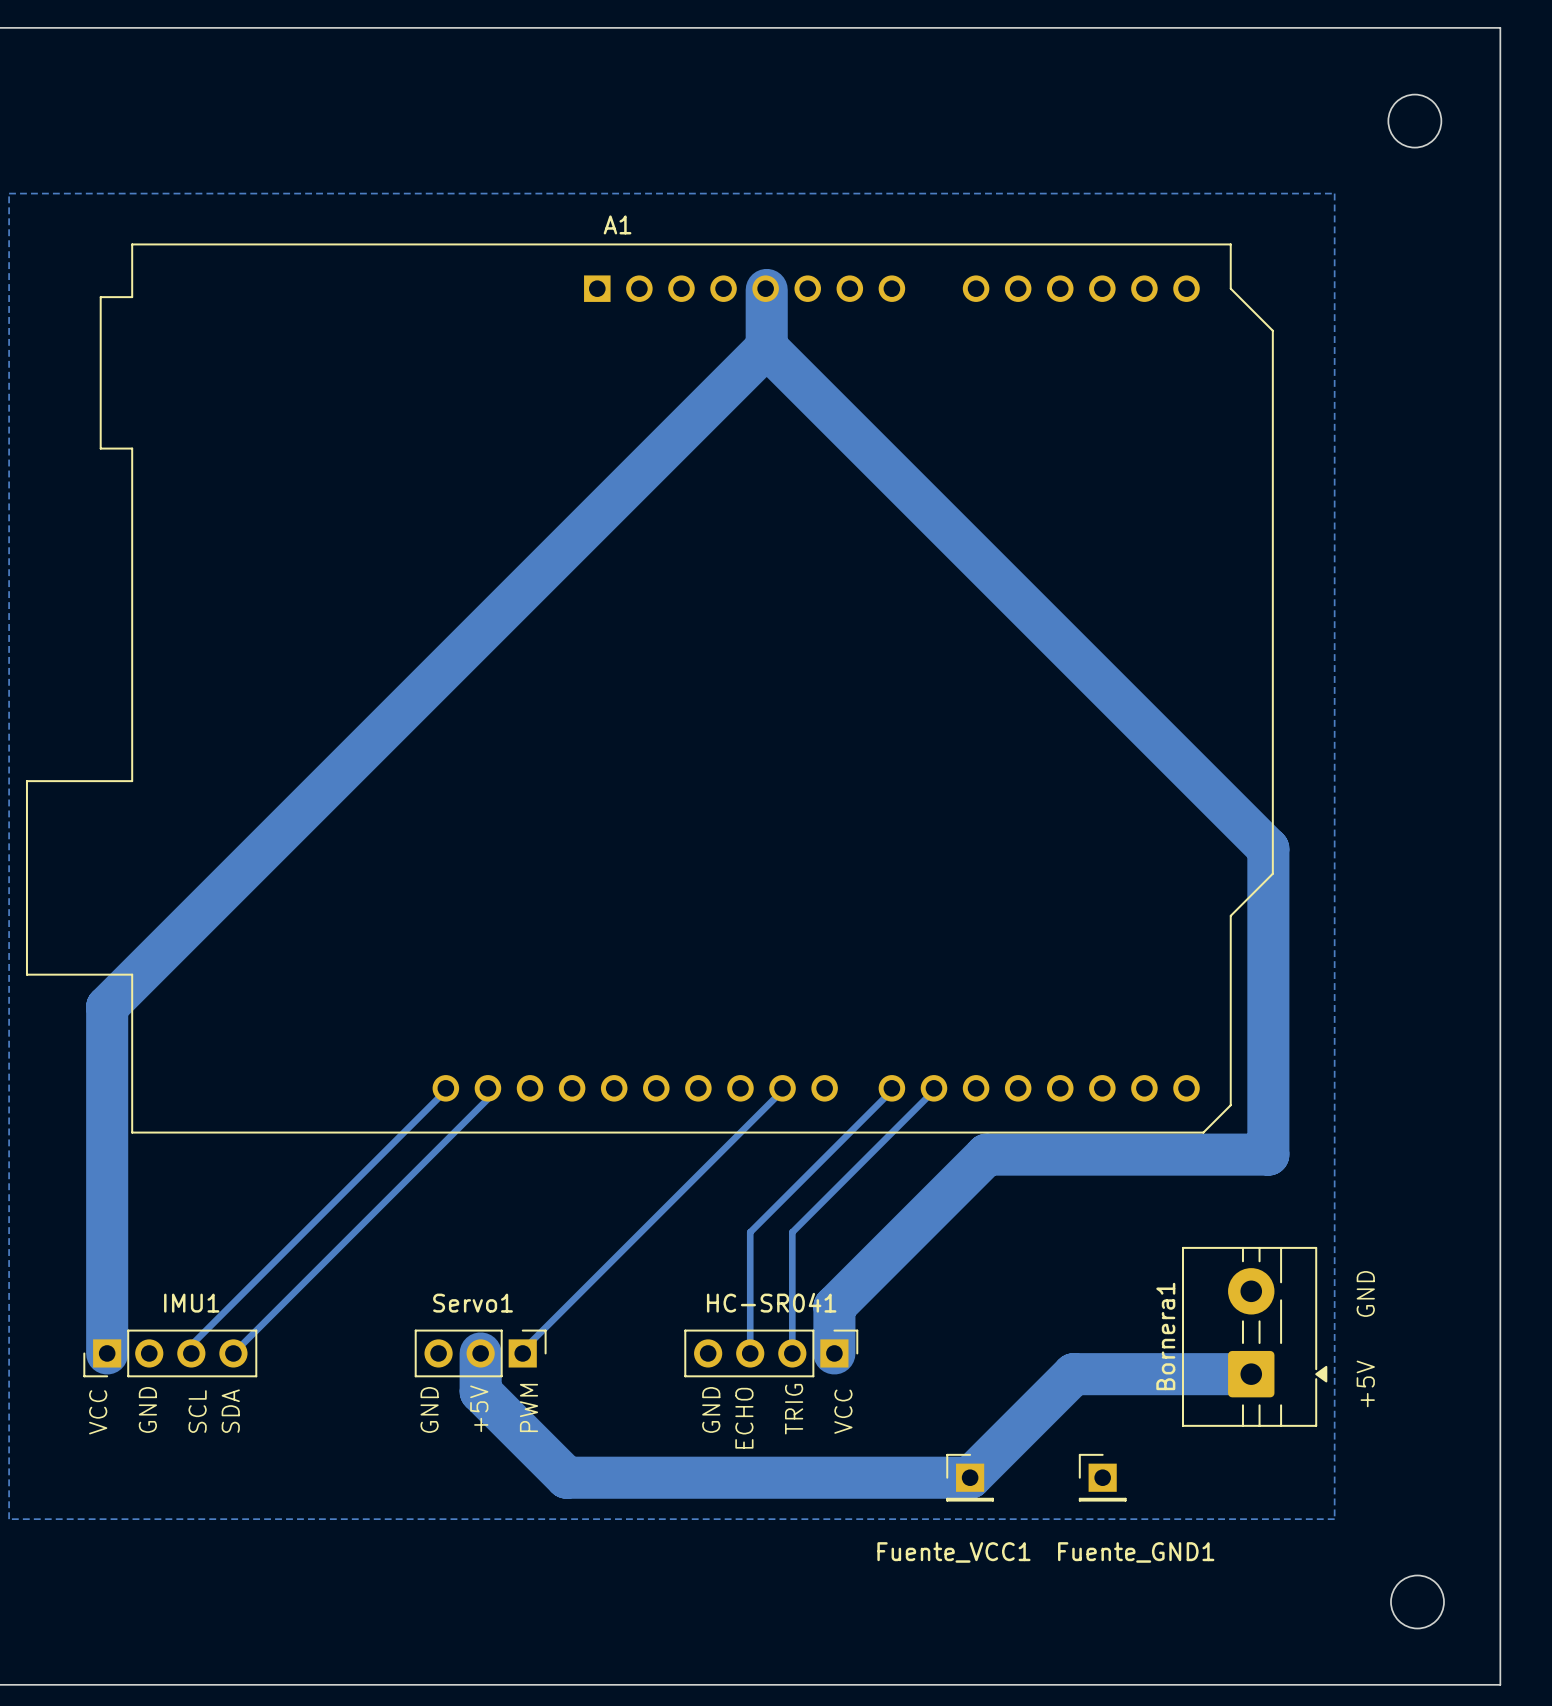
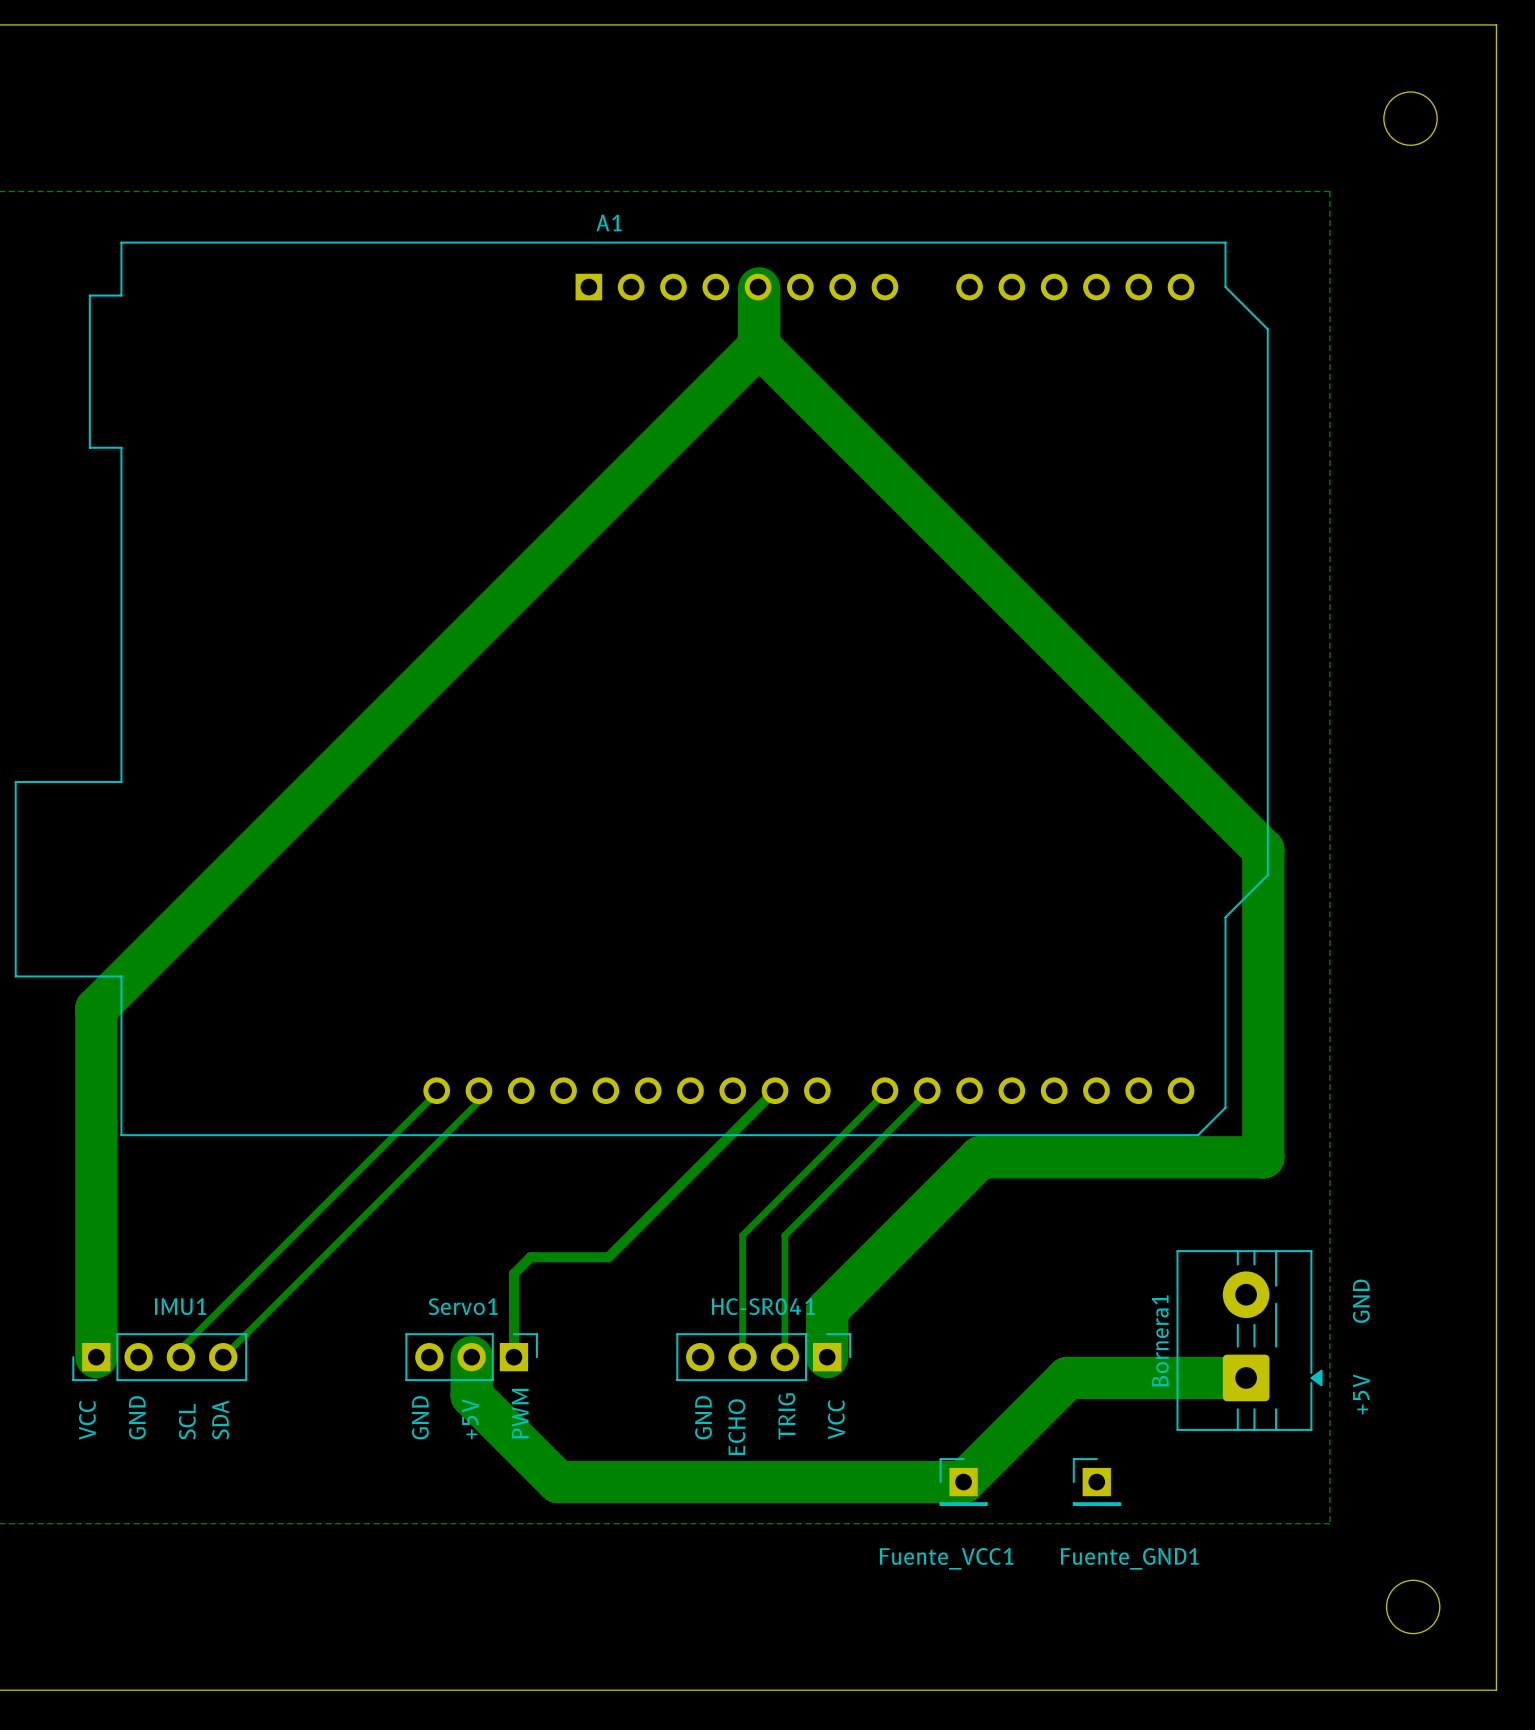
bottom track: (783, 1089) (522, 1350) -> (775, 1090) (608, 1257) (530, 1257) (513, 1273) (513, 1354)

